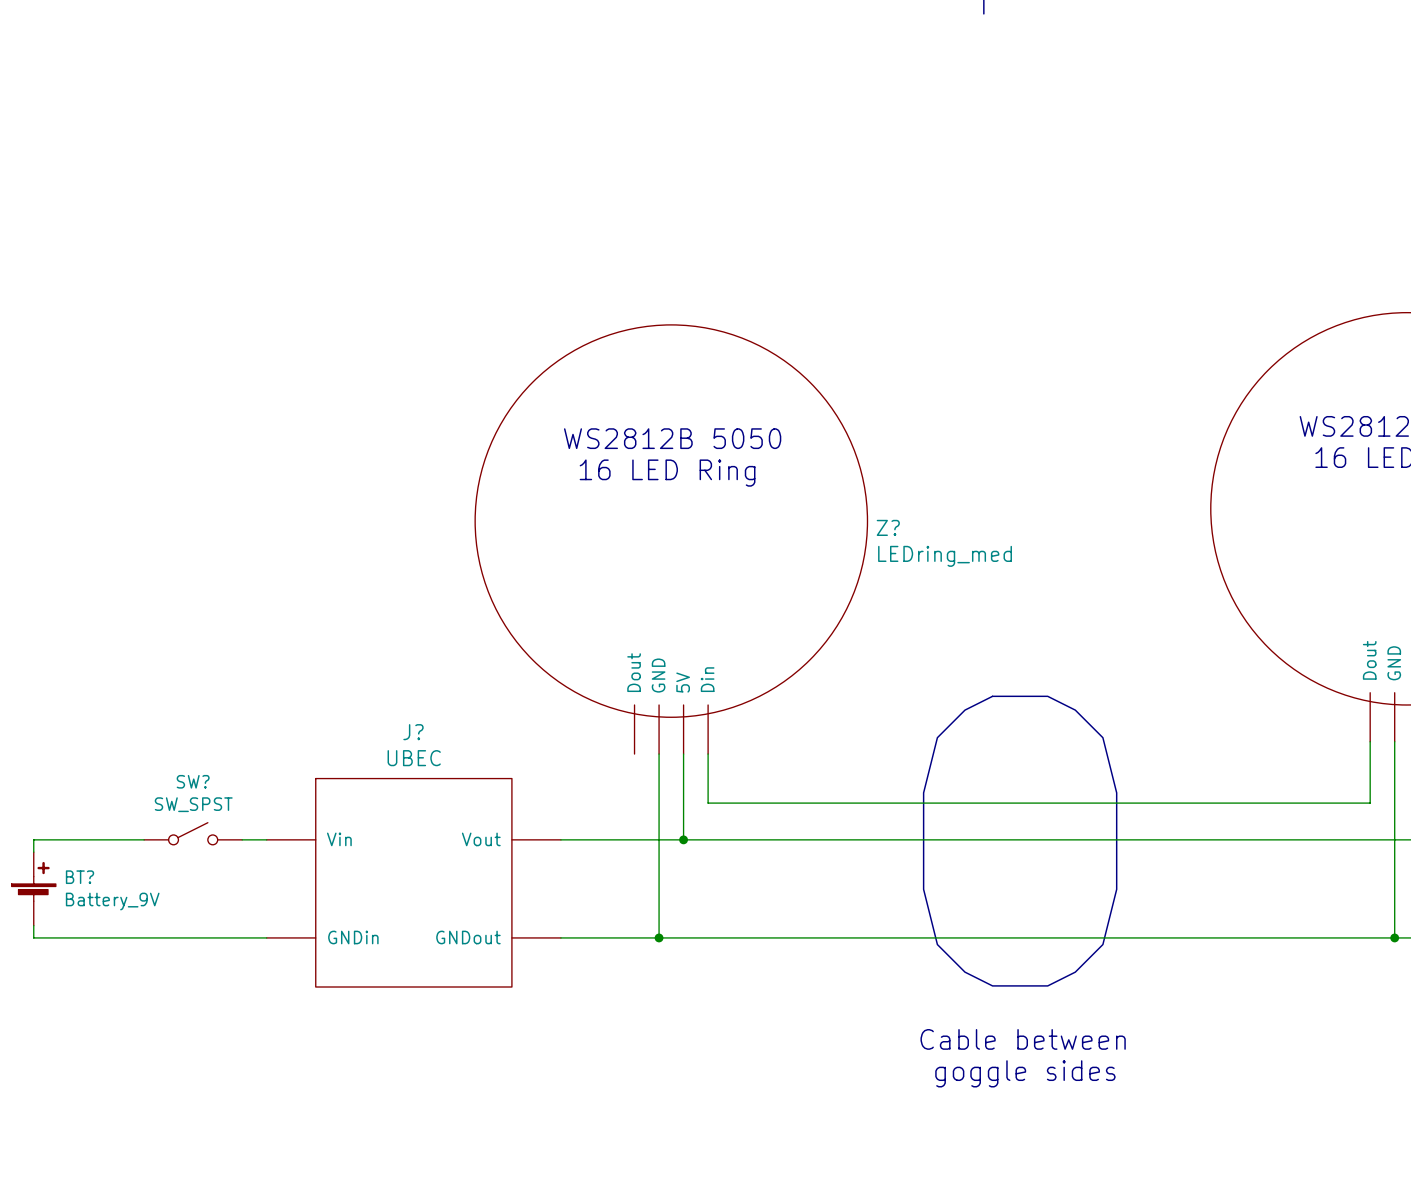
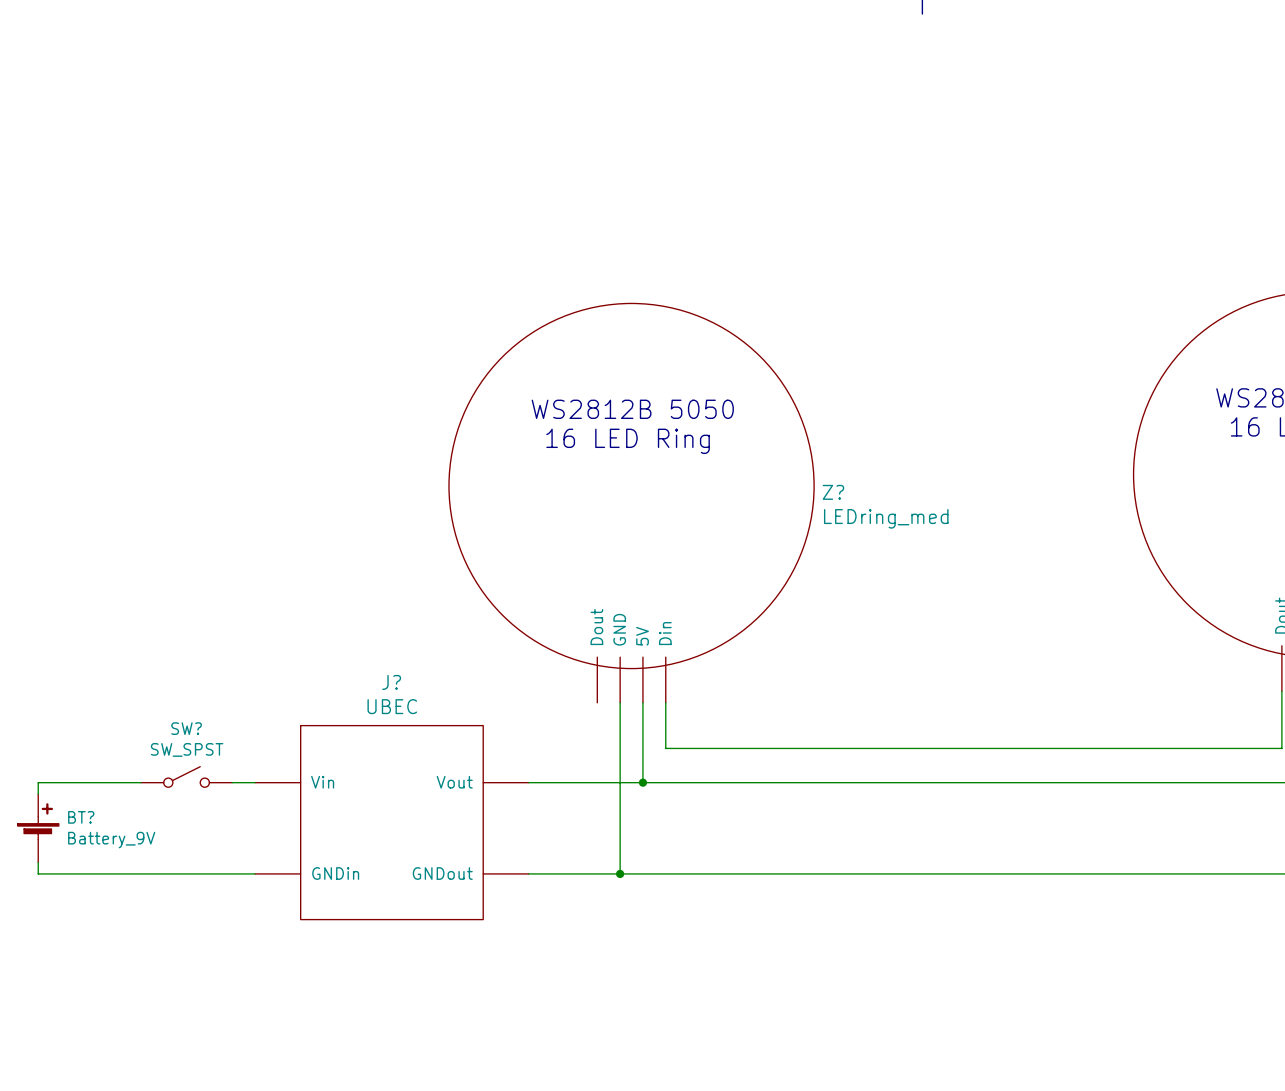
text: O (1020, 841) -> none
text: Cable between (1023, 1039) -> none
text: goggle sides (1025, 1073) -> none

